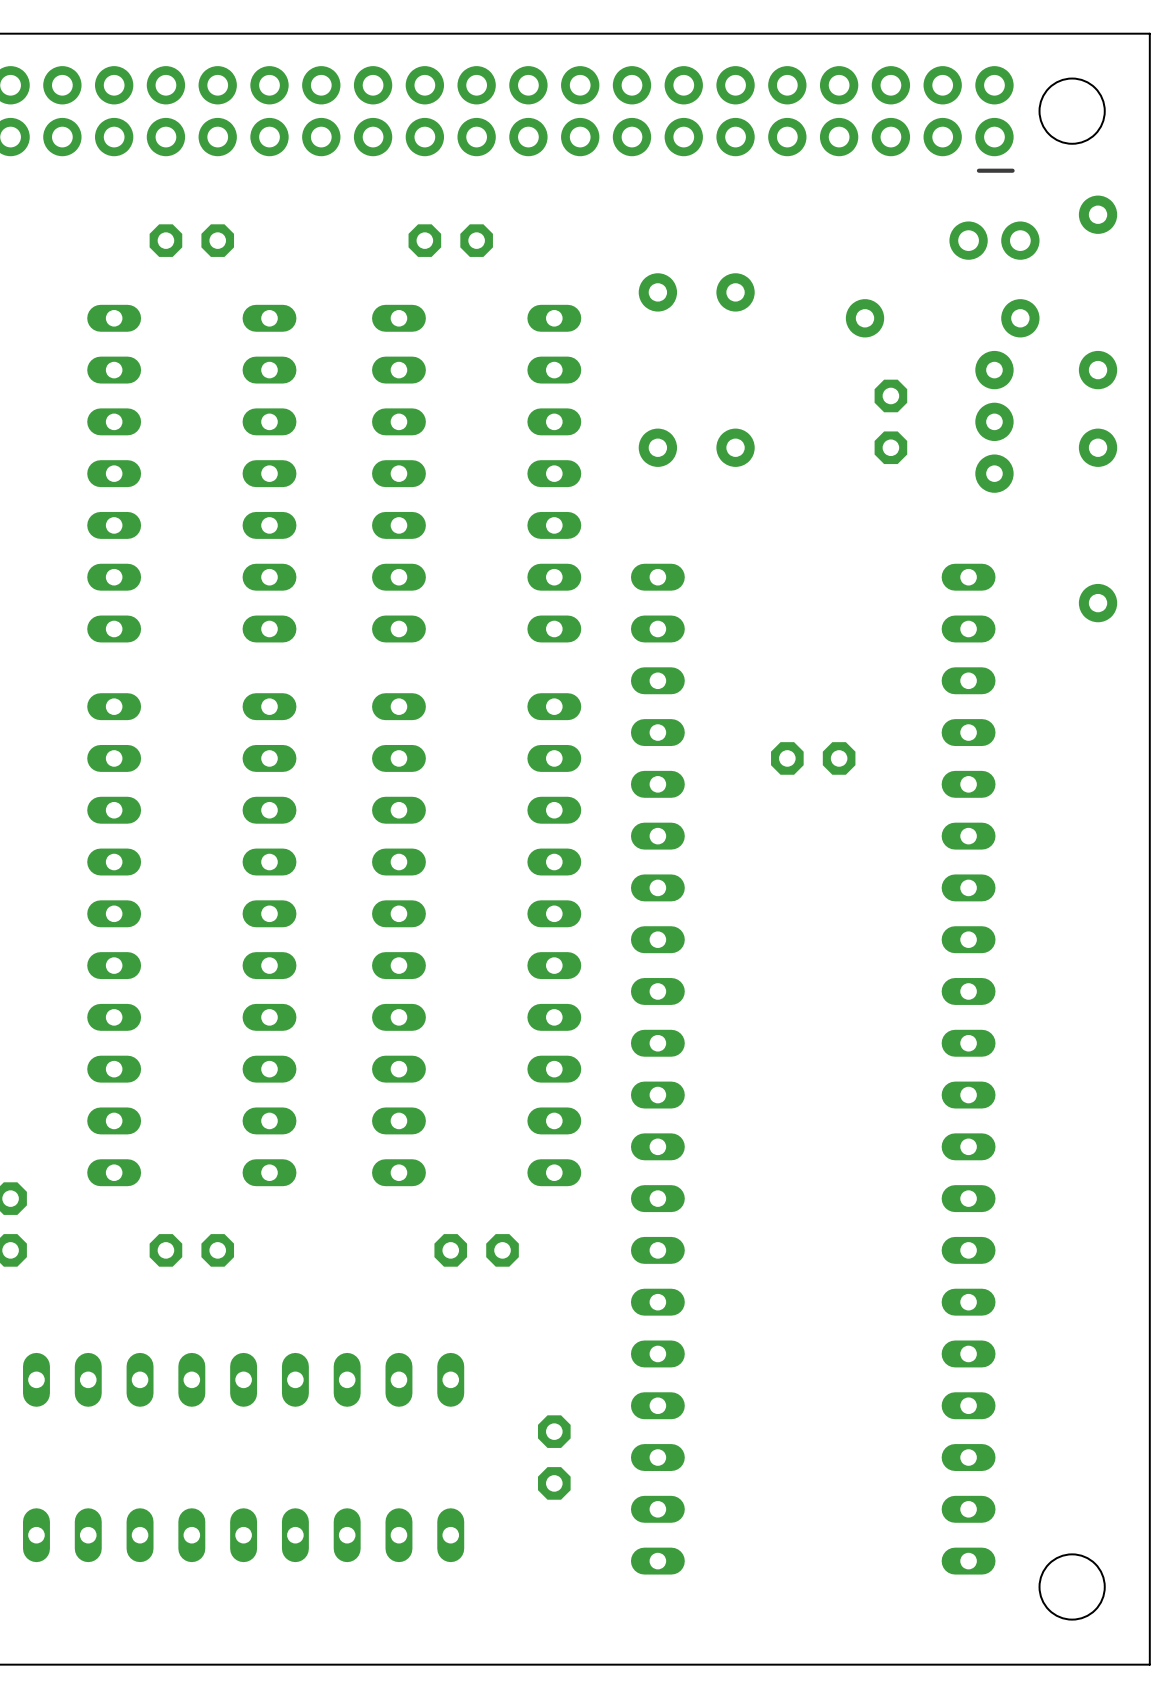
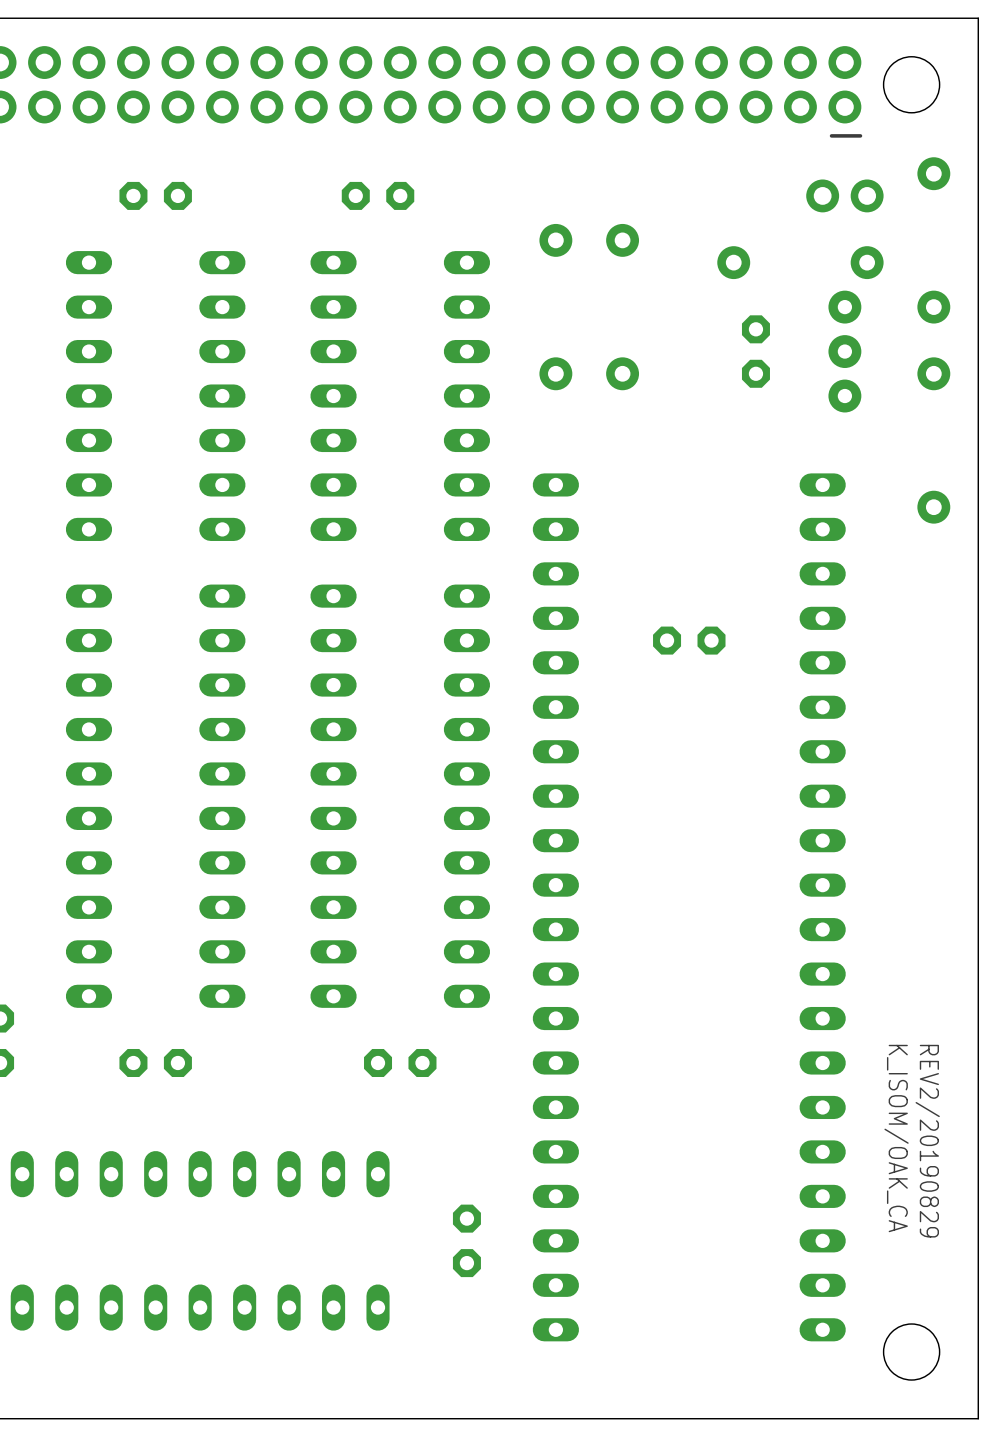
text: none -> K_ISOM/OAK_CA (896, 1138)
text: none -> REV2/20190829 (927, 1141)

